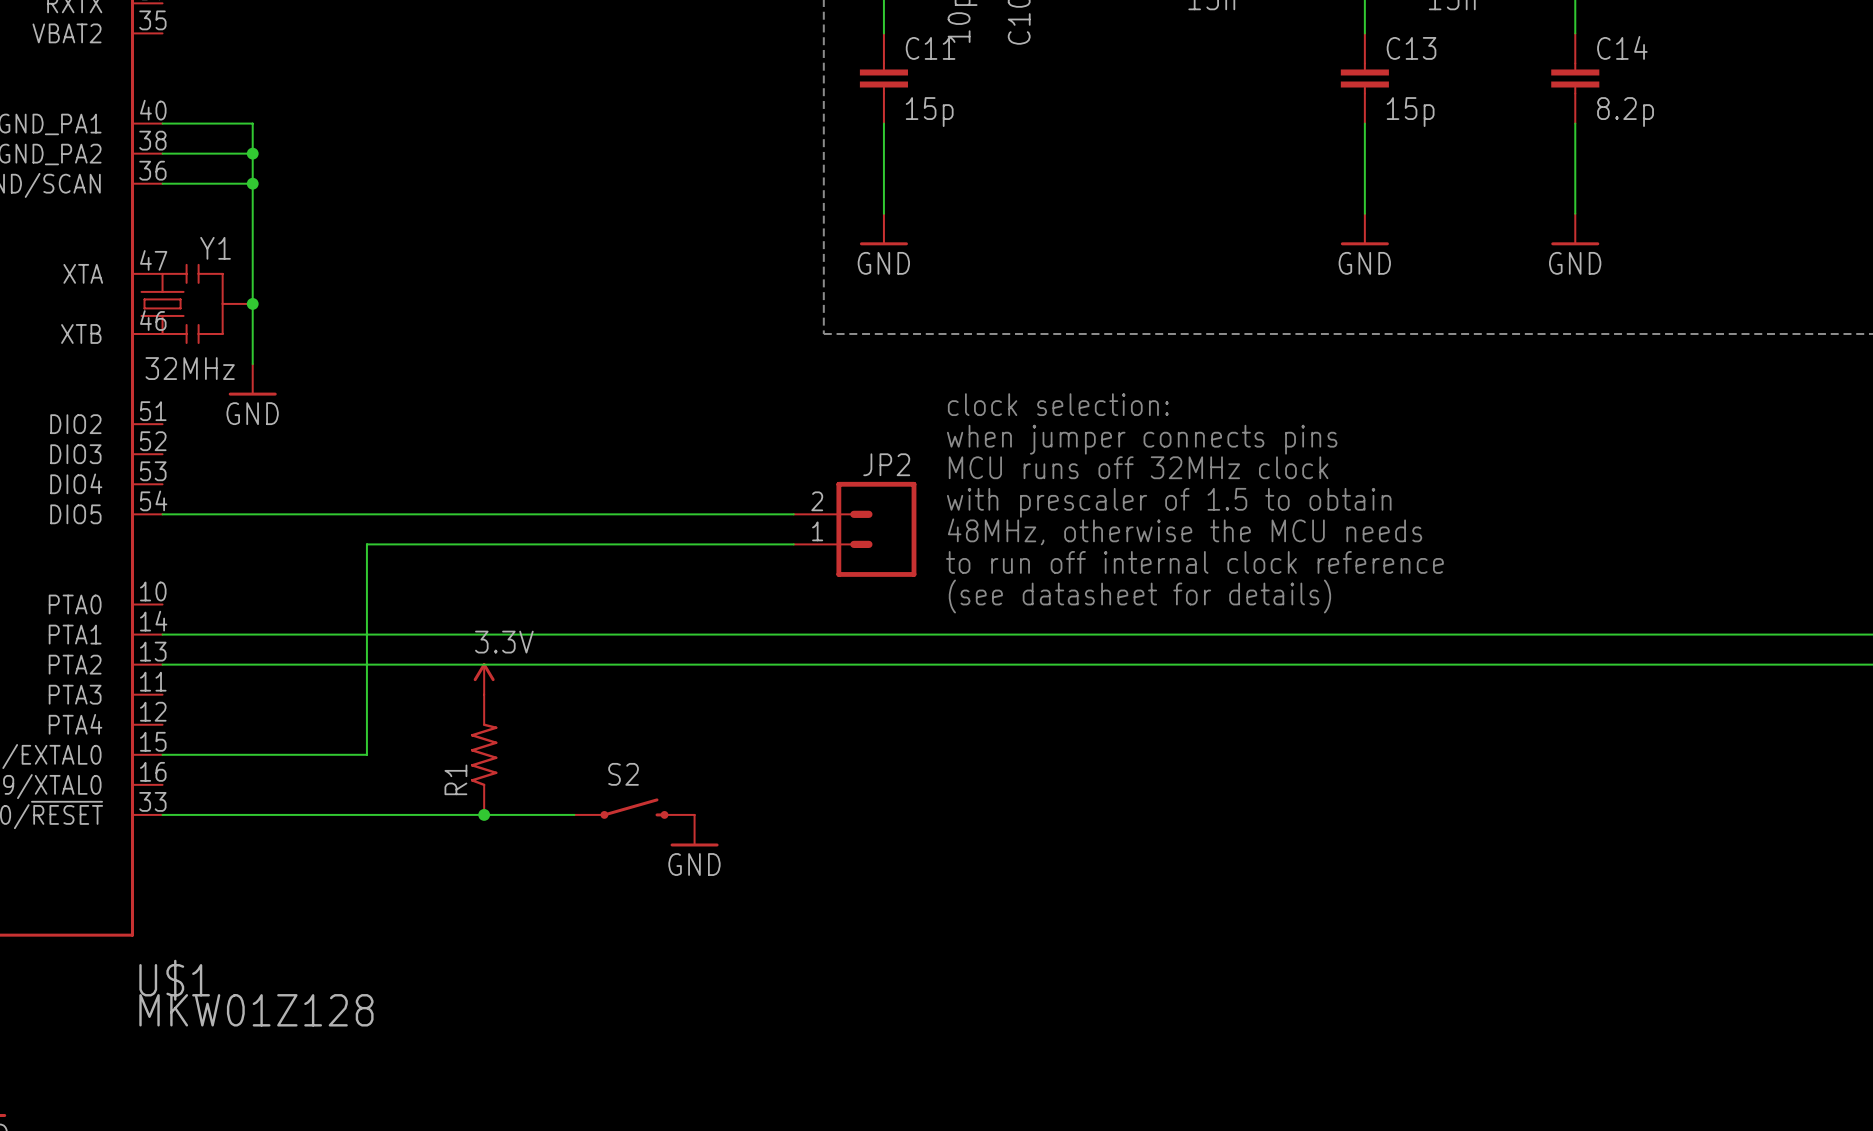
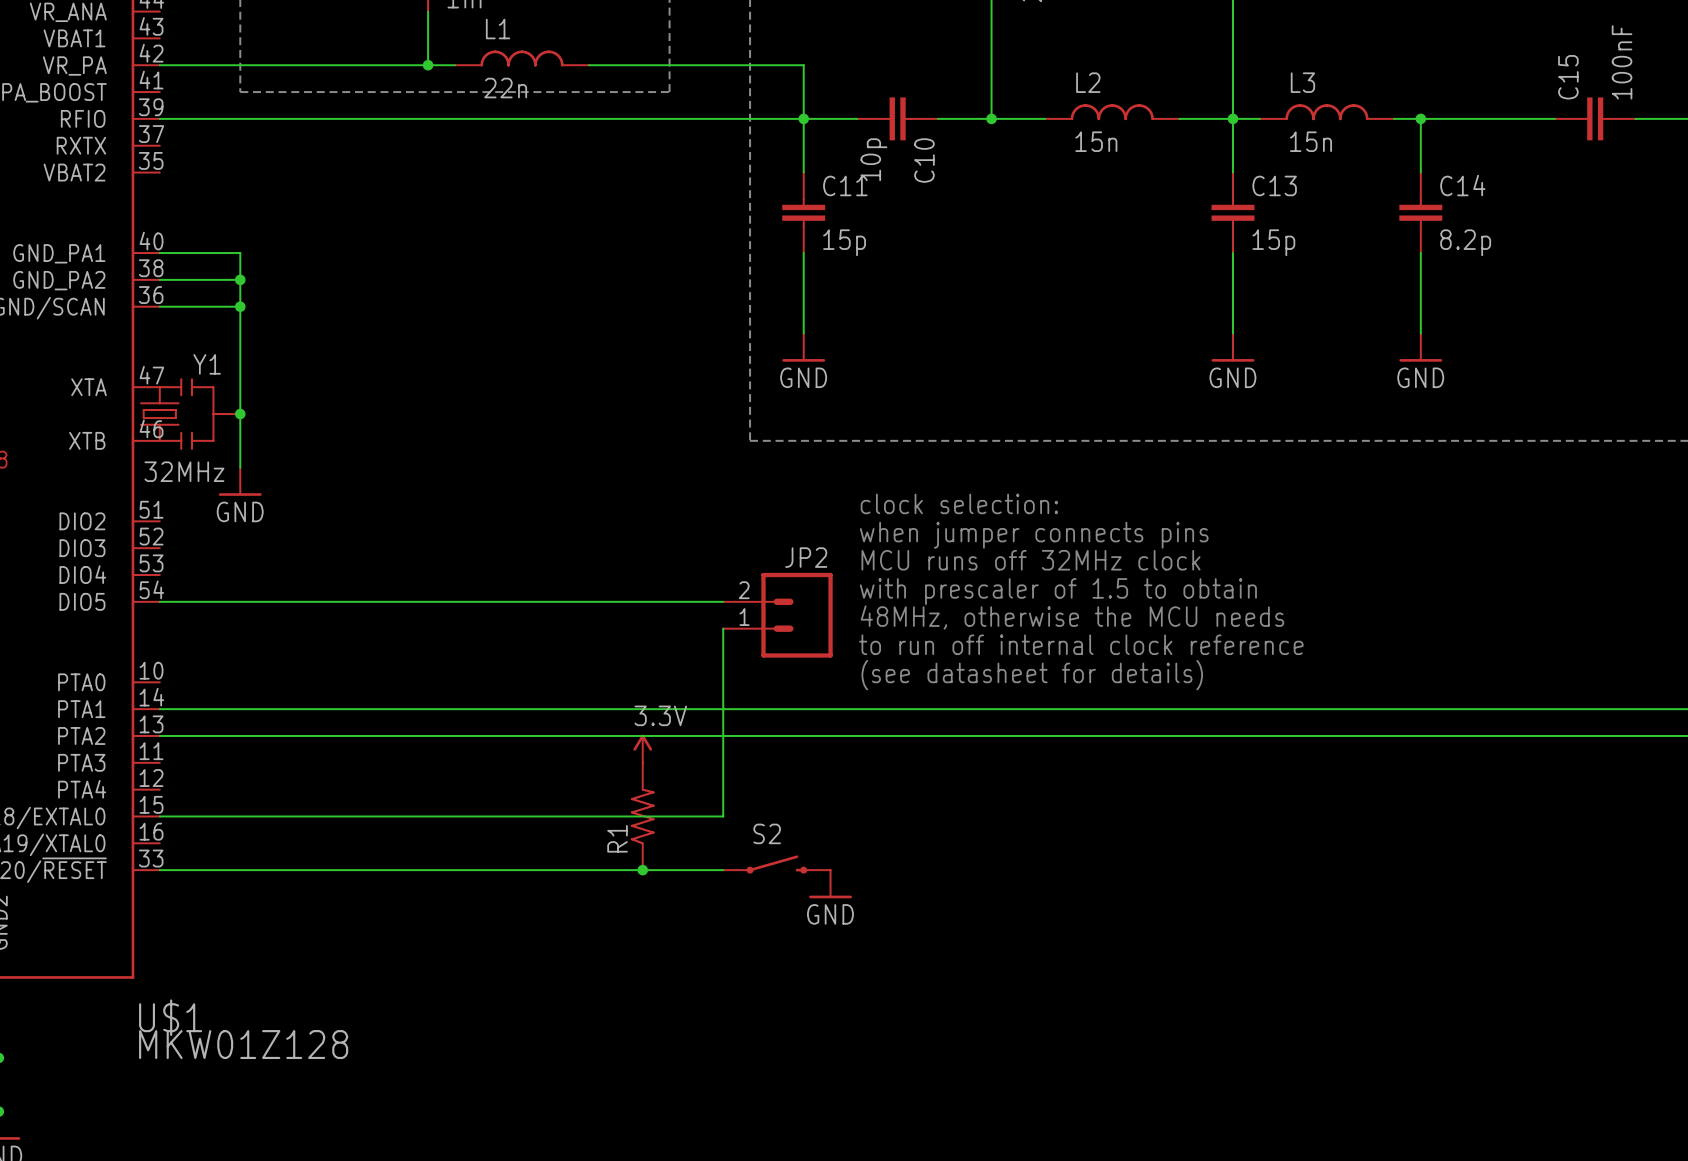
wire: (793, 544) (366, 544) (366, 754) -> (723, 628) (723, 816) (342, 816)
power symbol position: 3.3V (484, 678) -> 3.3V (642, 748)
R1 position: (484, 754) -> (642, 816)
S2 position: (634, 808) -> (776, 864)
junction: (484, 814) -> none
wire: none -> (527, 870) (723, 870)
junction: none -> (642, 870)
power symbol position: GND (694, 830) -> GND (830, 884)

